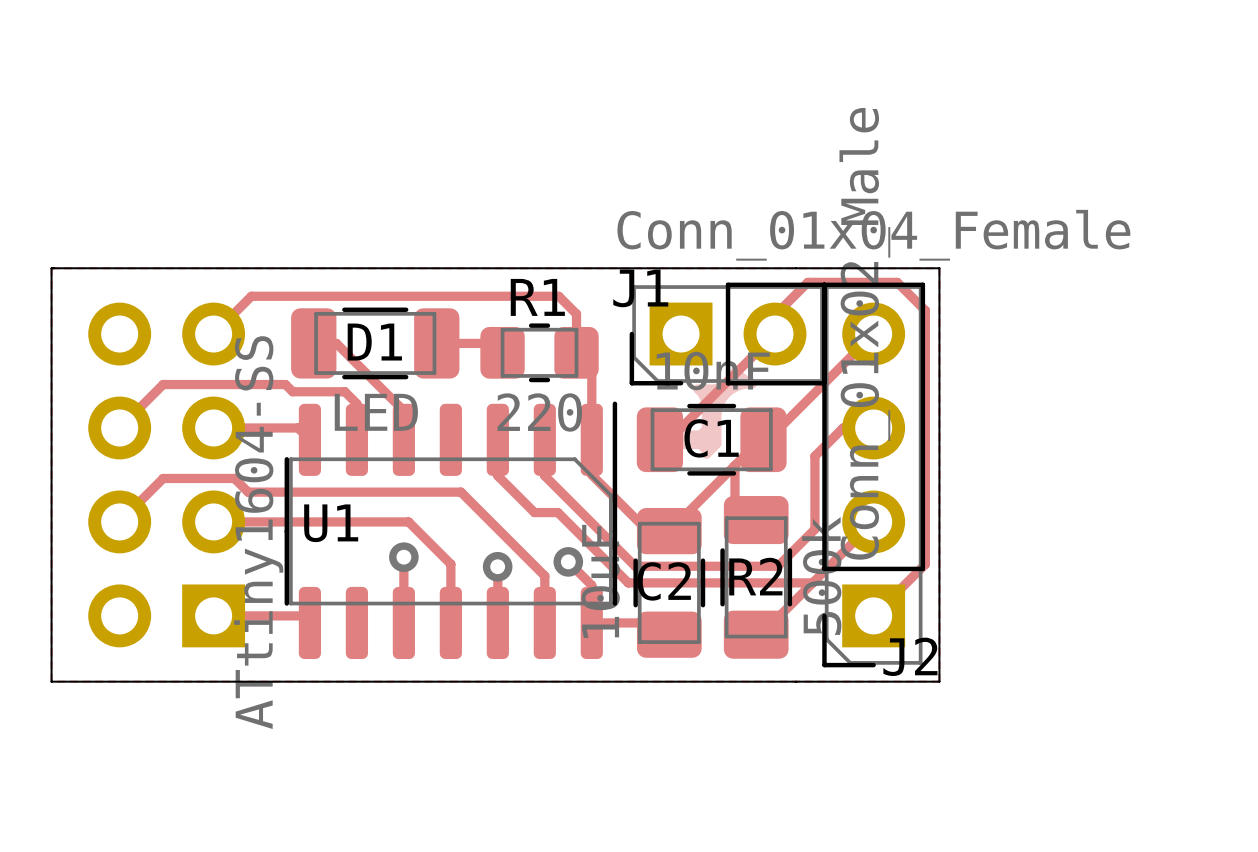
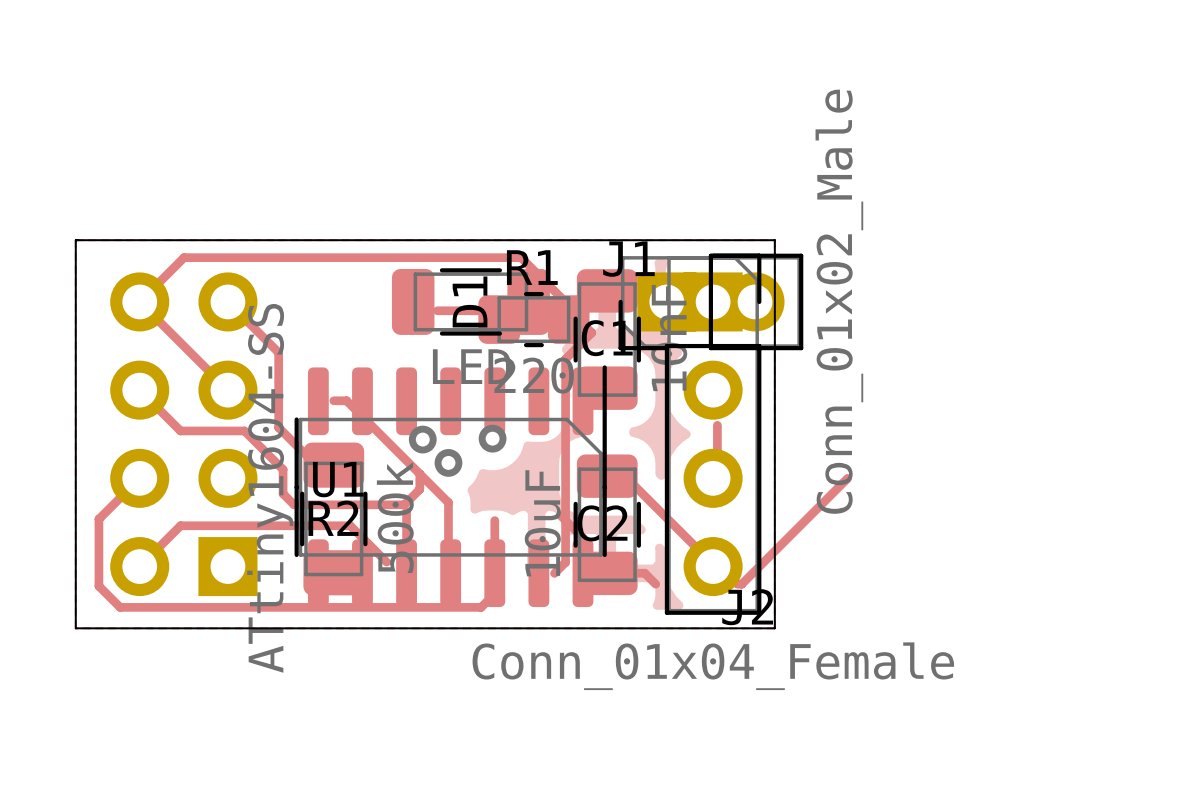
board edge: (796, 268) (939, 268) (939, 681) (796, 681) -> (774, 240) (774, 628)
track: (213, 334) (251, 296) (558, 296) (576, 314) (576, 352) (580, 352) (591, 364) (591, 474) (636, 519) -> (227, 301) (278, 352) (278, 427) (316, 465) (333, 465)
track: none -> (560, 301) (591, 332) (565, 359) (565, 562) (554, 573)
track: (873, 334) (767, 439) (760, 439) (669, 531) (647, 531) -> (713, 564) (635, 486)
D1 name rotation: 0° (374, 342) -> 90° counterclockwise (470, 301)
track: (313, 343) (336, 343) (403, 410) (403, 439) -> none
D1 position: (375, 343) -> (470, 301)
track: (119, 427) (163, 384) (285, 384) (292, 391) (344, 391) (356, 403) (356, 439) -> (139, 390) (180, 430) (244, 430) (283, 469) (283, 493) (294, 504) (404, 504) (419, 489) (419, 473)
track: (213, 427) (298, 427) (309, 439) -> (227, 390) (139, 301) (184, 257) (521, 257) (565, 301)
track: (873, 427) (843, 427) (814, 456) (814, 529) (777, 566) (635, 566) (544, 475) (544, 439) -> none
track: none -> (333, 400) (346, 400) (448, 502) (448, 562)
track: (497, 439) (497, 475) (534, 512) (557, 512) (628, 582) (812, 582) -> none
track: (659, 439) (669, 439) (775, 334) (775, 315) (807, 282) (897, 282) (925, 310) (925, 564) (873, 615) -> none
C1 rotation: 0° (711, 439) -> 90° clockwise (607, 339)
C1 position: (711, 439) -> (607, 339)
J2 rotation: 0° (873, 474) -> 180° (713, 434)
via: none -> (492, 438)
via: none -> (422, 439)
via: none -> (448, 462)
track: (119, 521) (163, 478) (234, 478) (248, 492) (460, 492) (544, 575) (544, 622) -> (139, 478) (98, 519) (98, 586) (120, 607) (481, 607) (492, 595) (492, 562)
track: (213, 521) (408, 521) (450, 564) (450, 622) -> none
via: (403, 557) -> none
via: (568, 561) -> none
via: (497, 566) -> none
R2 position: (756, 577) -> (333, 518)
C2 position: (669, 582) -> (607, 524)
track: none -> (386, 562) (350, 525) (180, 525) (139, 566)
track: (213, 615) (302, 615) (309, 622) -> none

